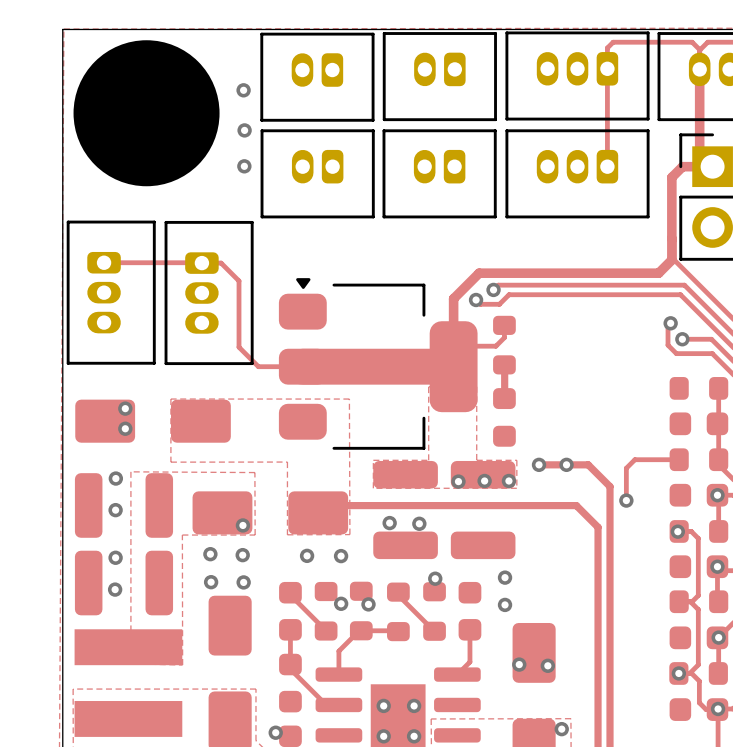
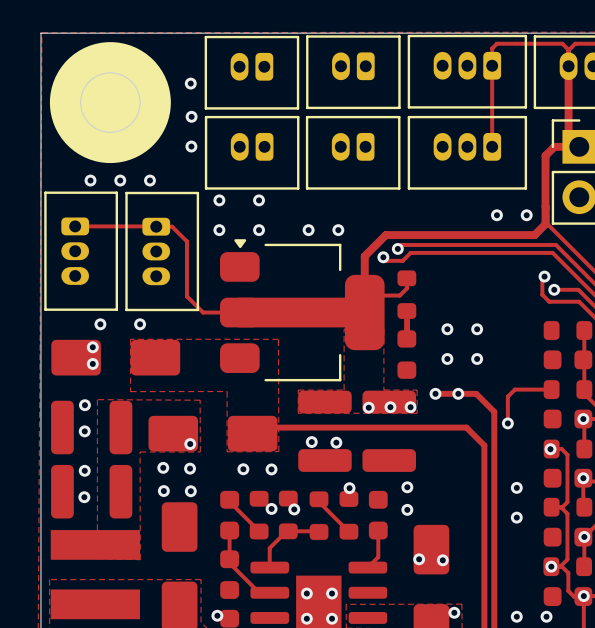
via: none -> (90, 180)
via: none -> (120, 180)
via: none -> (149, 180)
via: none -> (219, 200)
via: none -> (259, 200)
via: none -> (496, 215)
via: none -> (526, 215)
via: none -> (219, 230)
via: none -> (259, 230)
via: none -> (308, 230)
via: none -> (338, 230)
via: none -> (100, 324)
via: none -> (140, 324)
via: none -> (447, 329)
via: none -> (477, 329)
via: none -> (447, 358)
via: none -> (477, 358)
via: none -> (516, 487)
via: none -> (516, 517)
via: none -> (516, 616)
via: none -> (546, 616)

